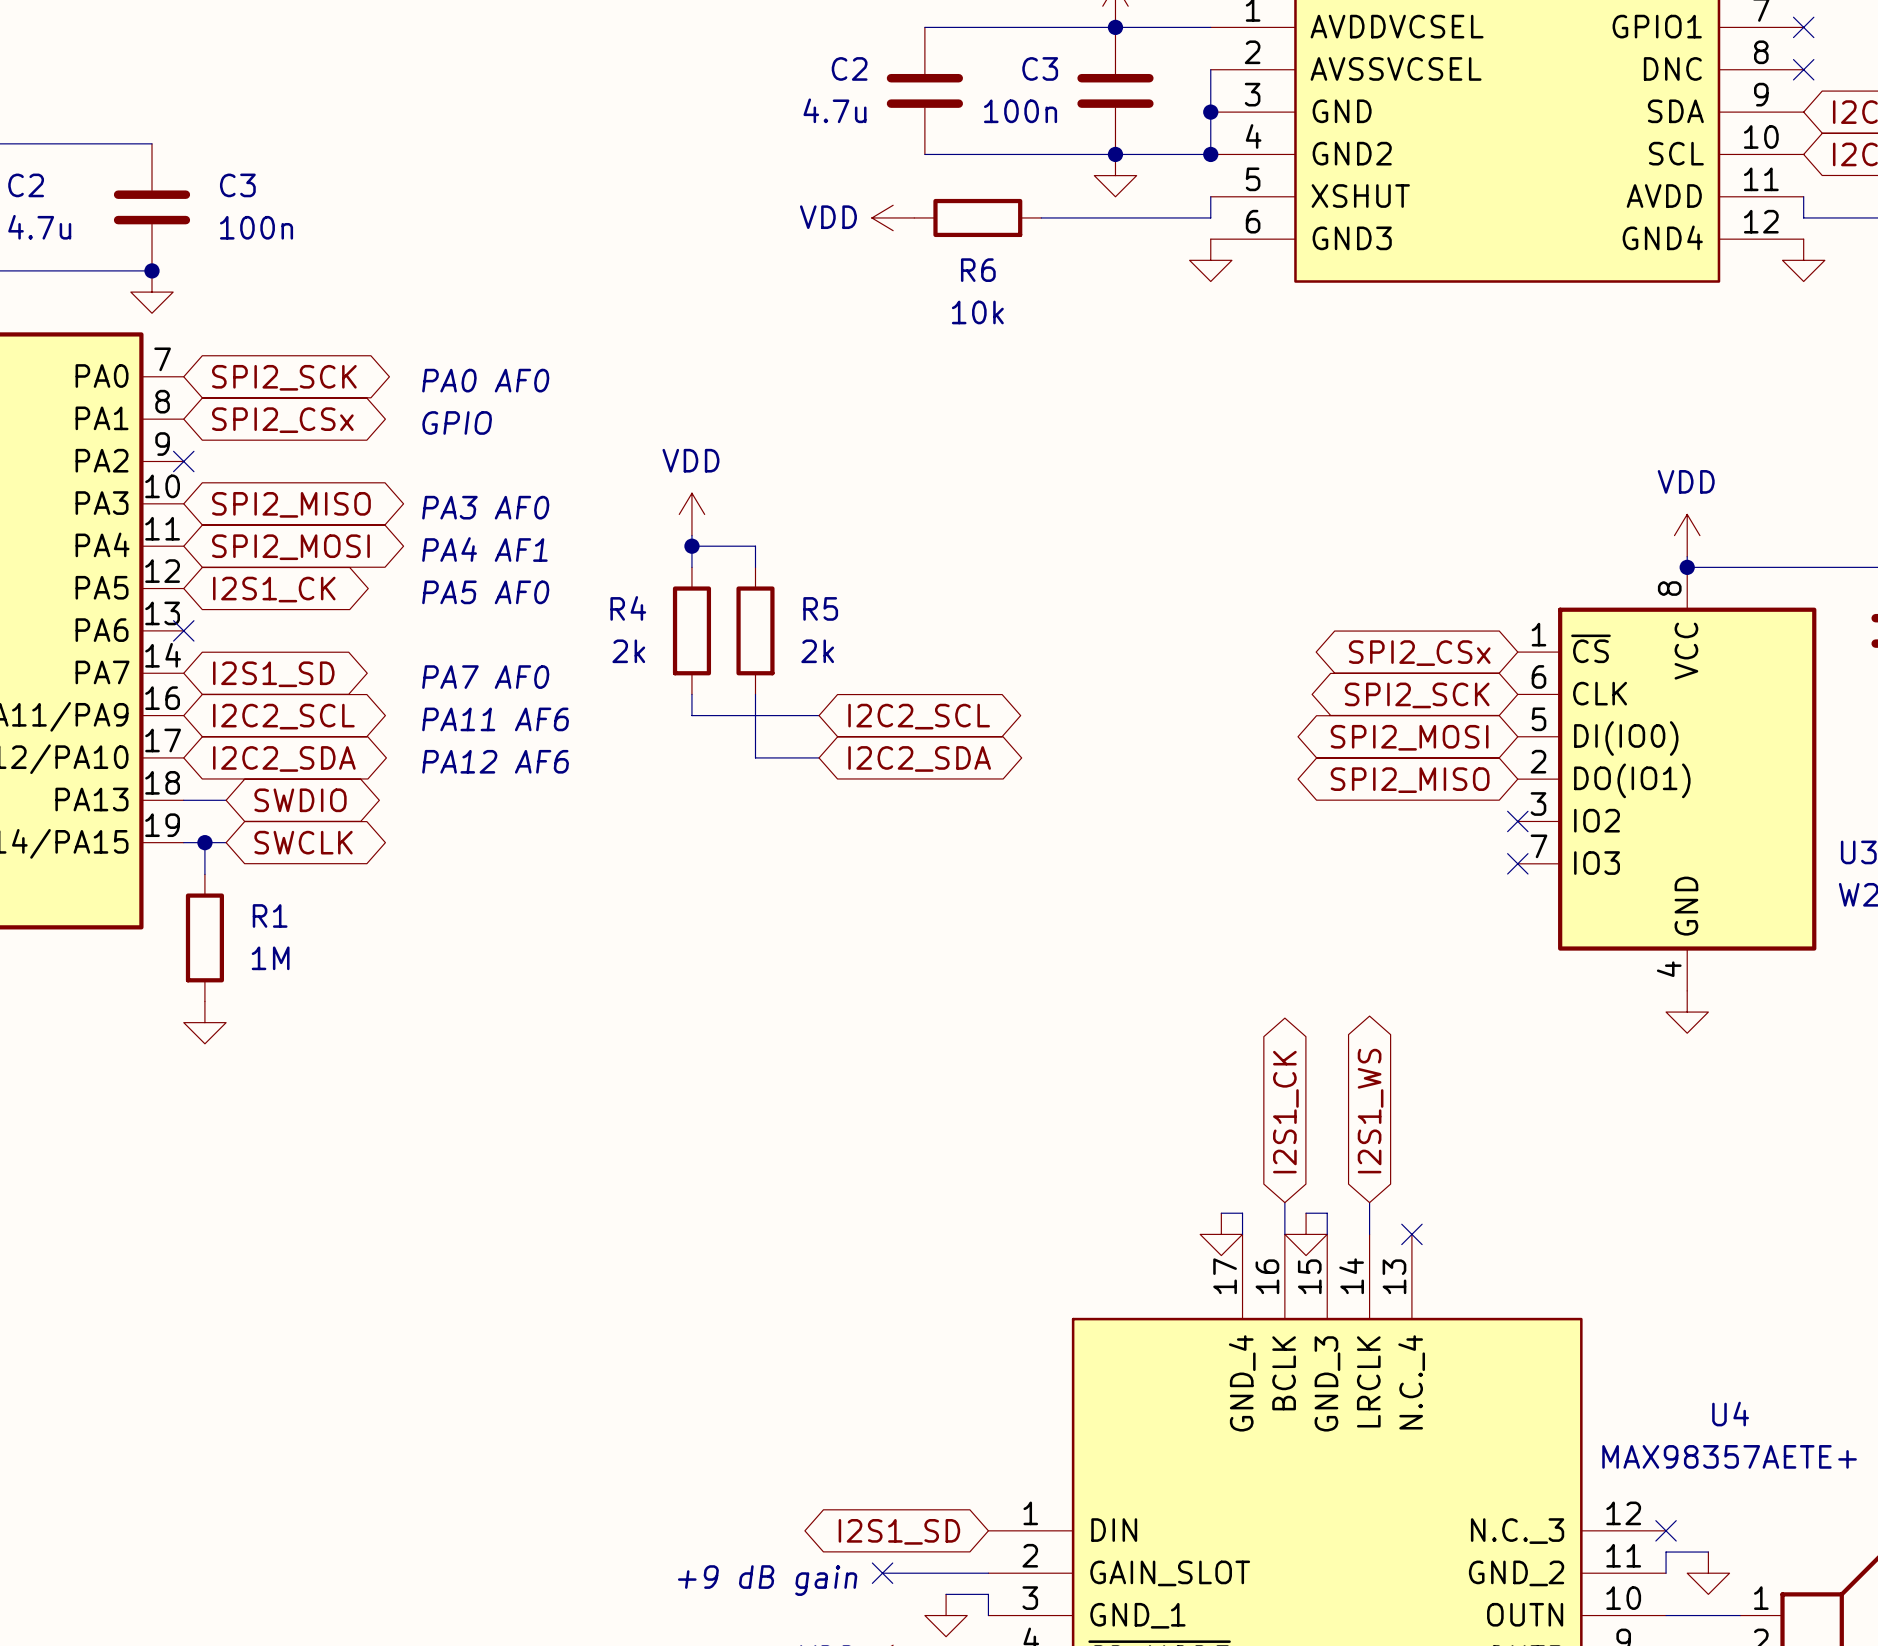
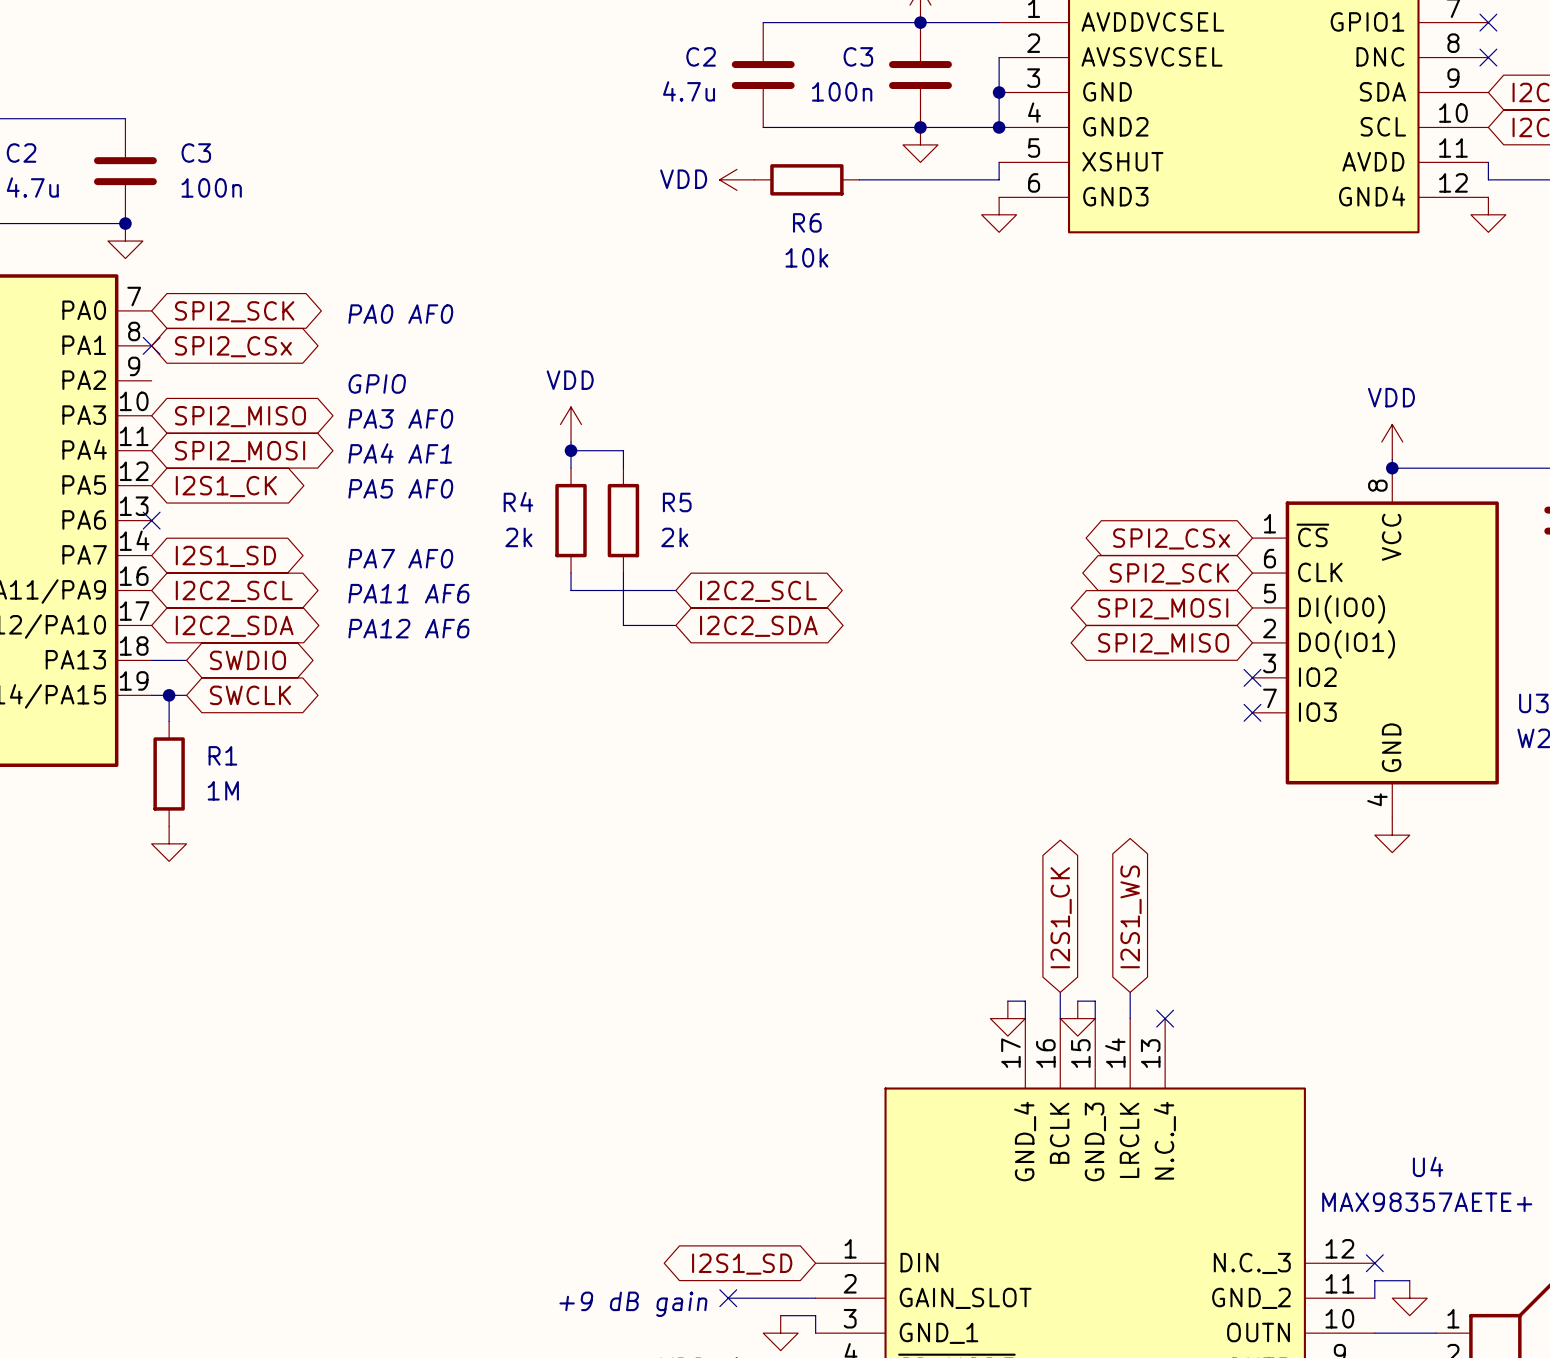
text position: GPIO (457, 422) -> GPIO (377, 383)
no-connect mark position: (183, 461) -> (151, 345)

